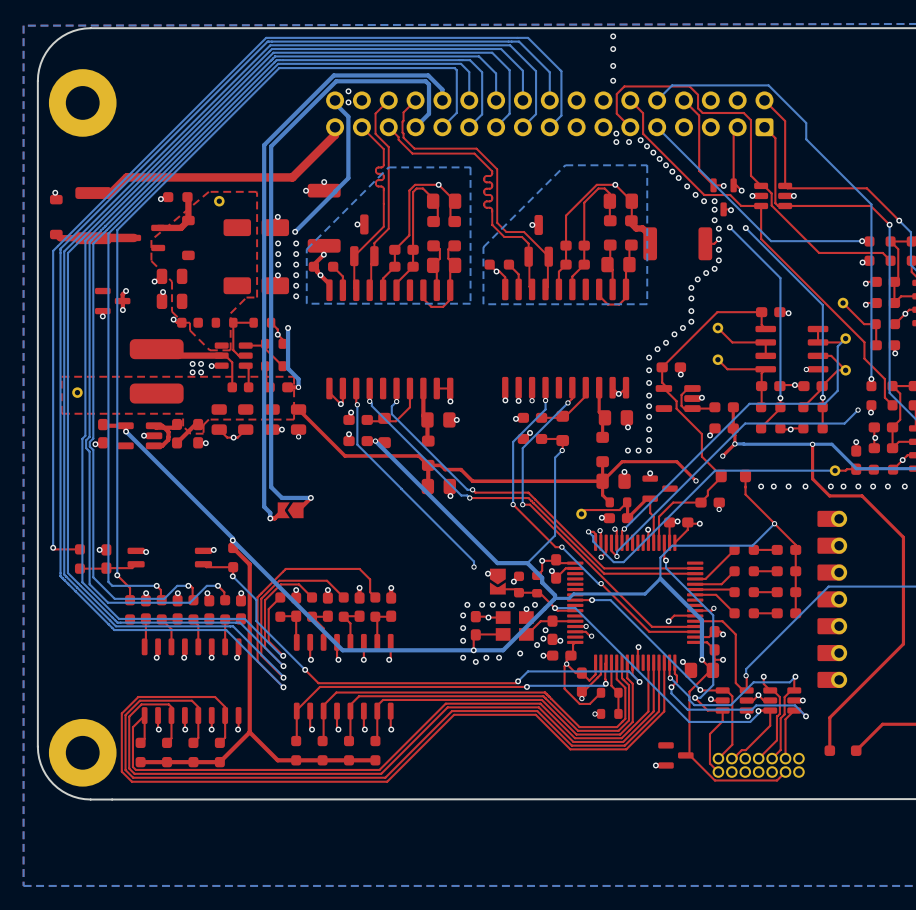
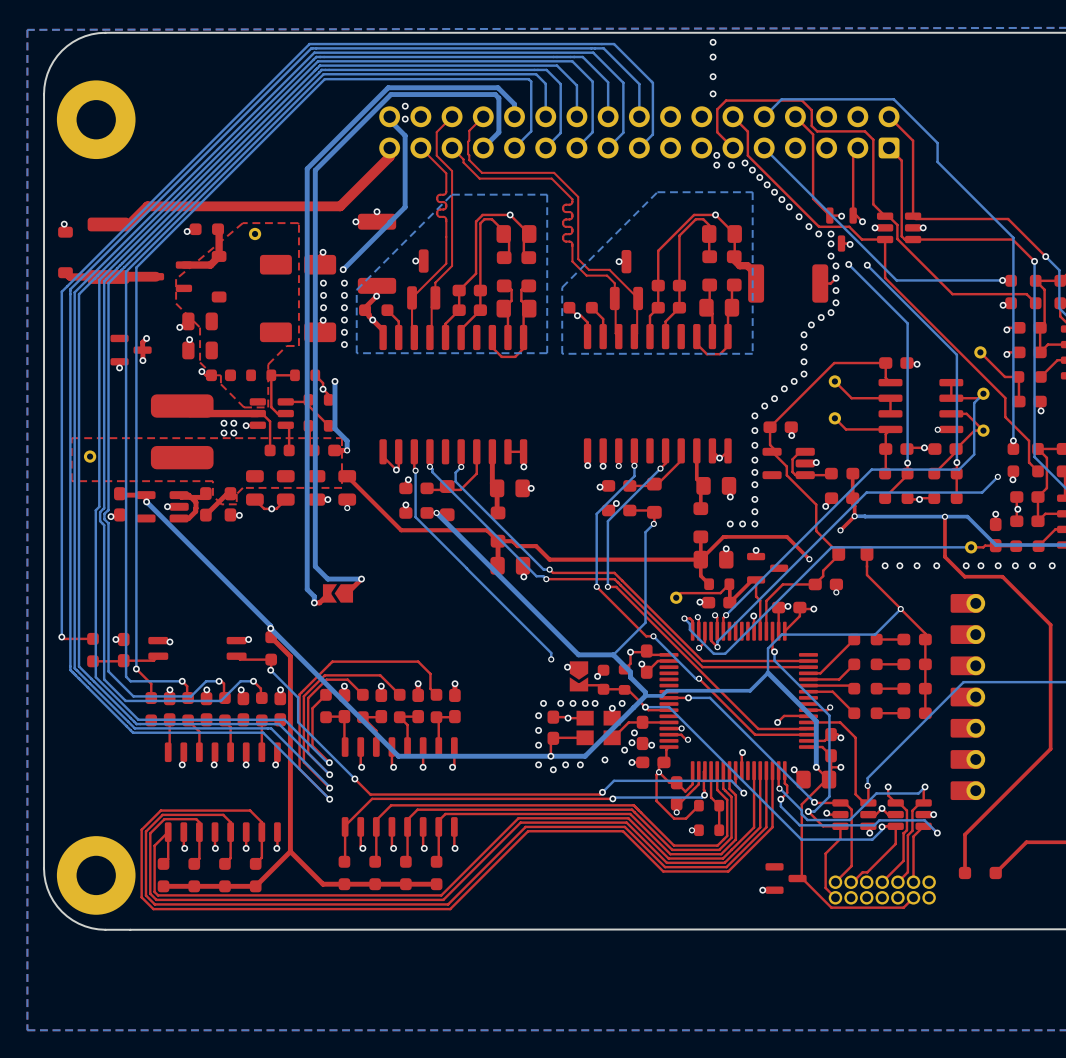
via: (905, 313) -> none
via: (902, 460) -> none

